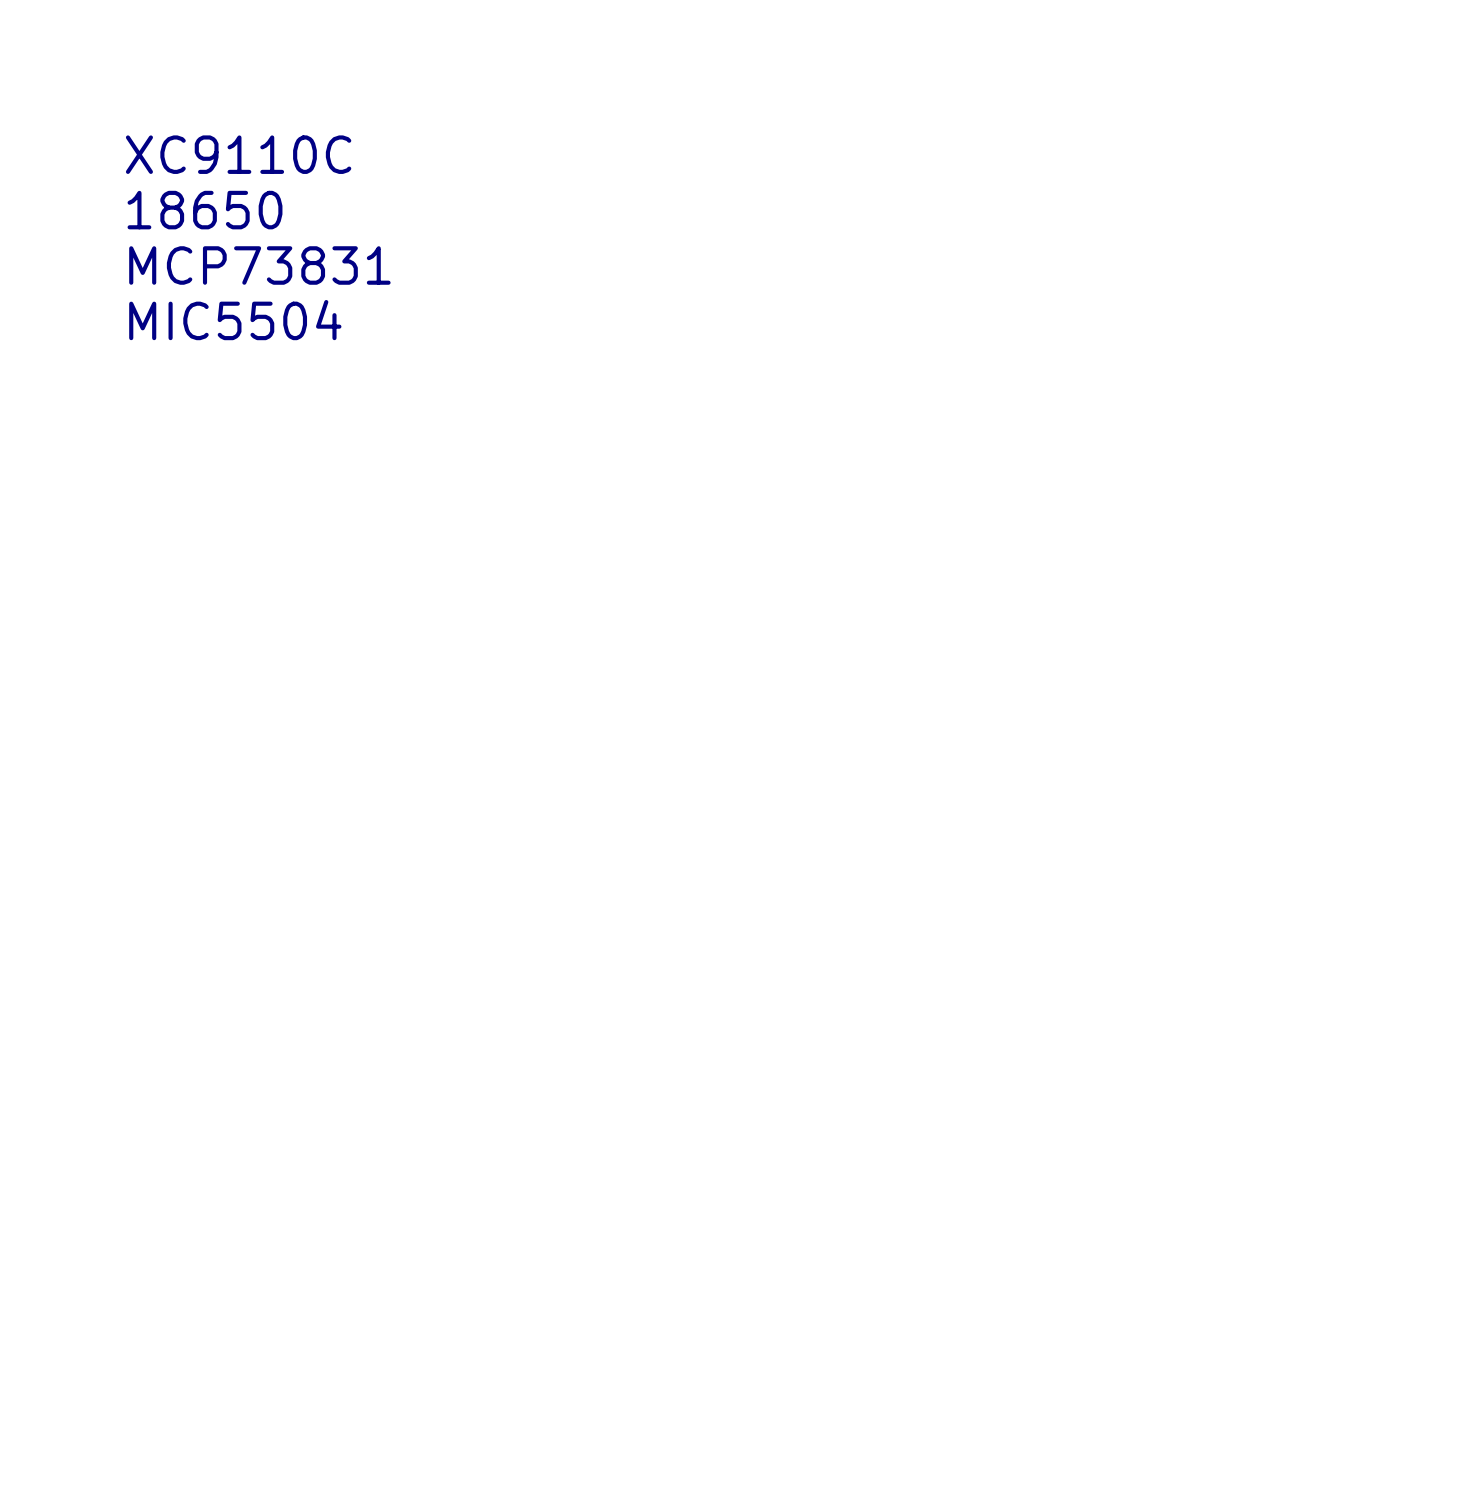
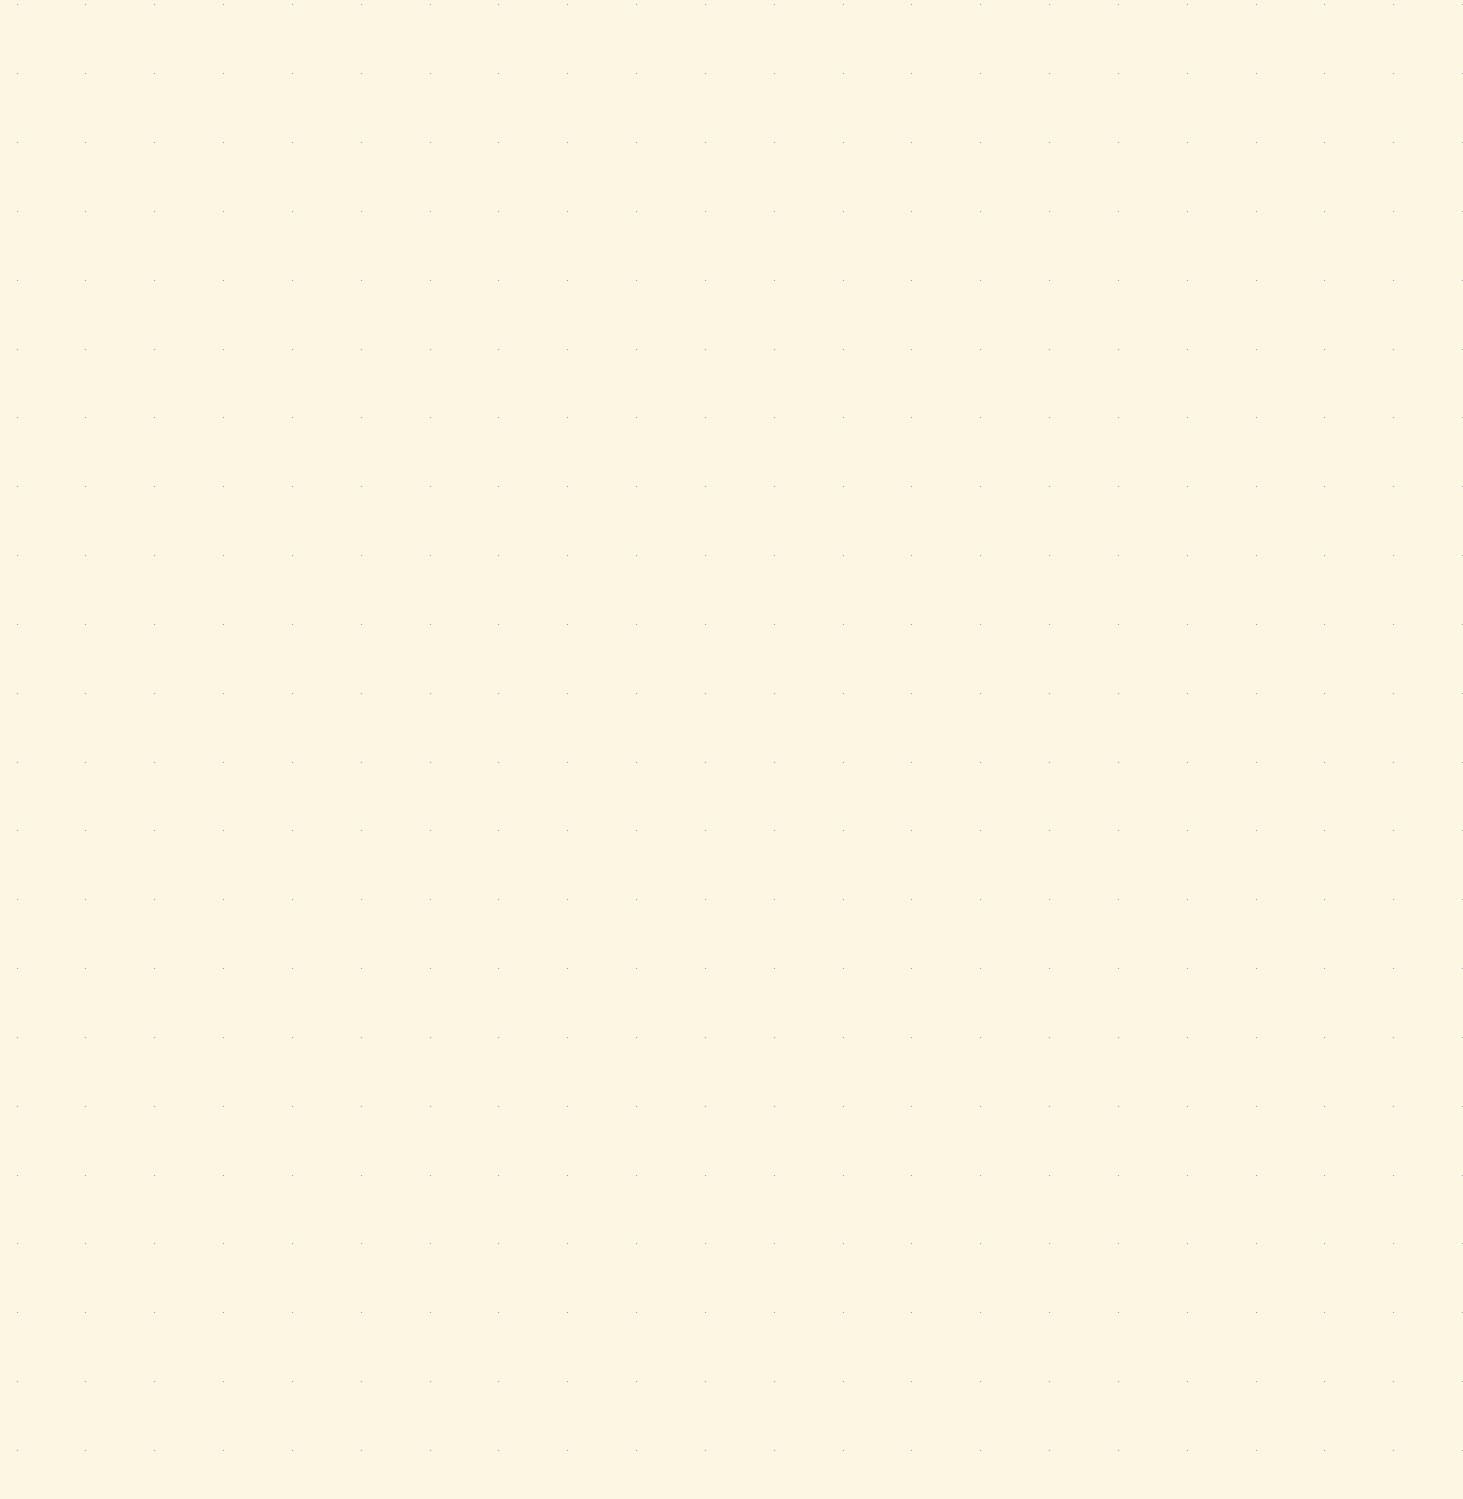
text: XC9110C (238, 154) -> none
text: 18650 (205, 210) -> none
text: MCP73831 (259, 265) -> none
text: MIC5504 (235, 320) -> none

